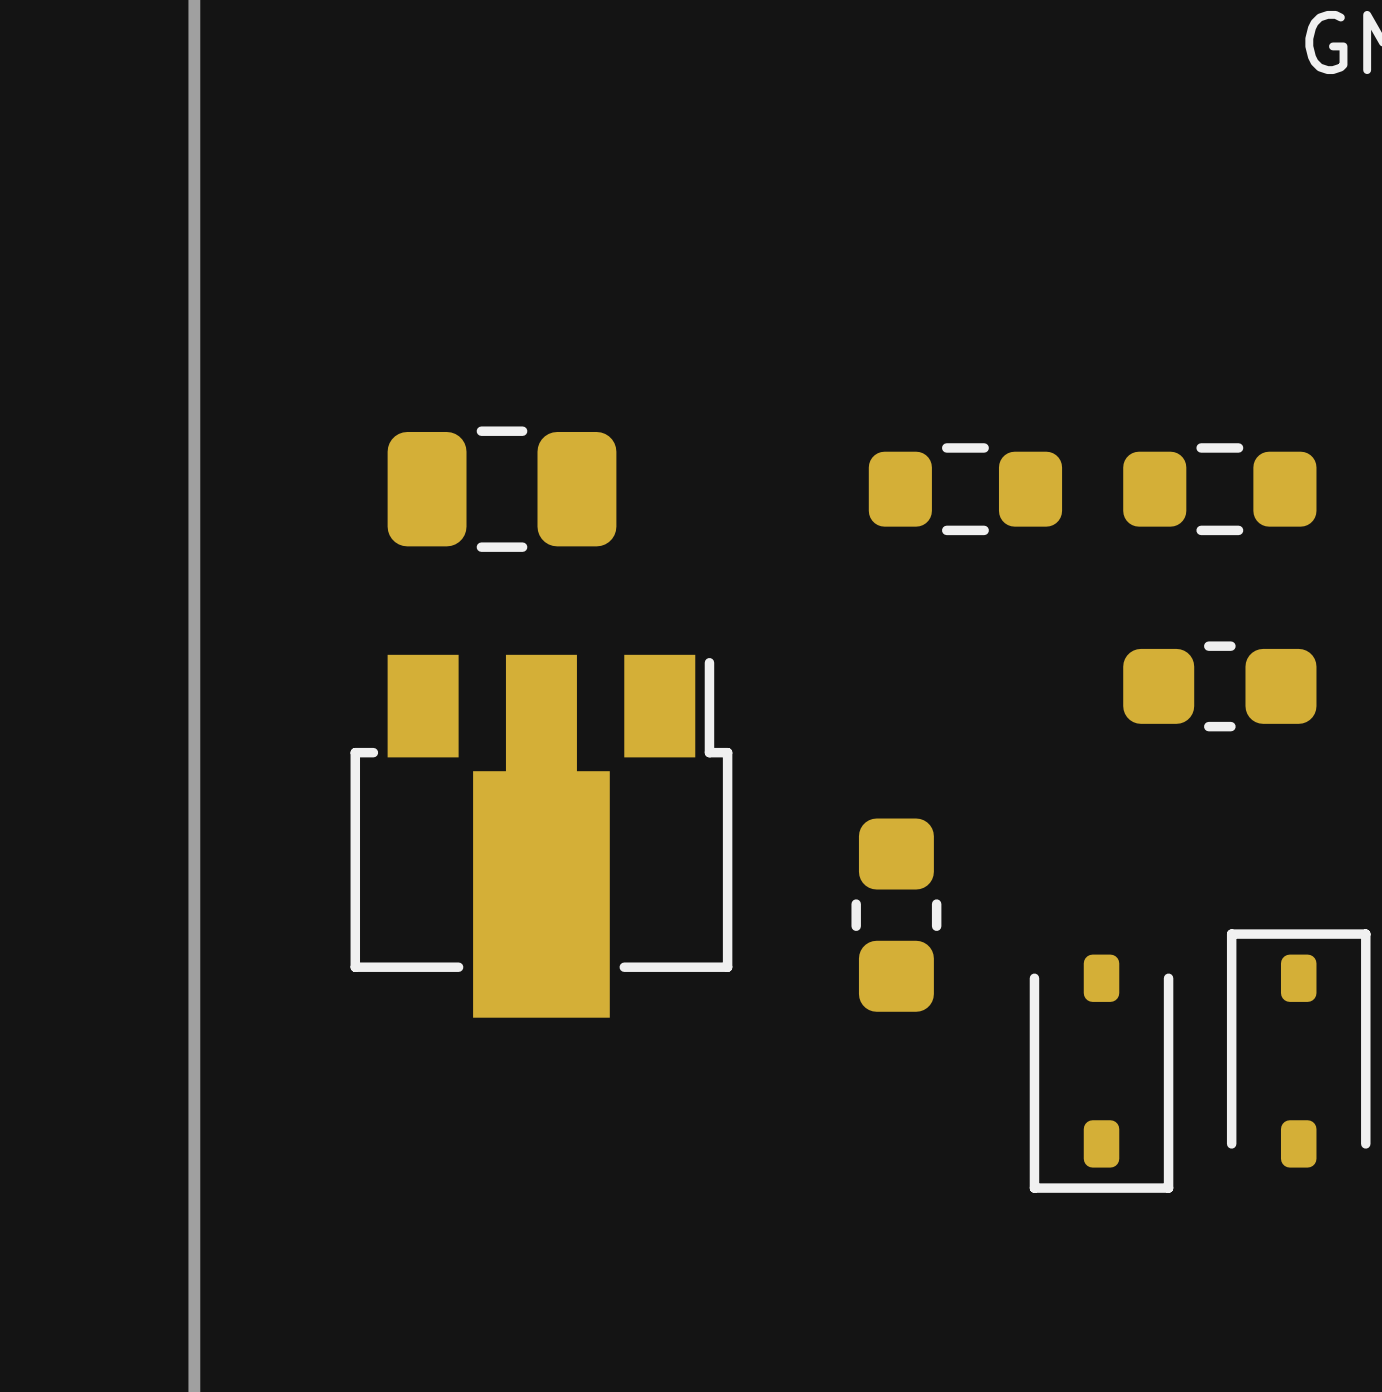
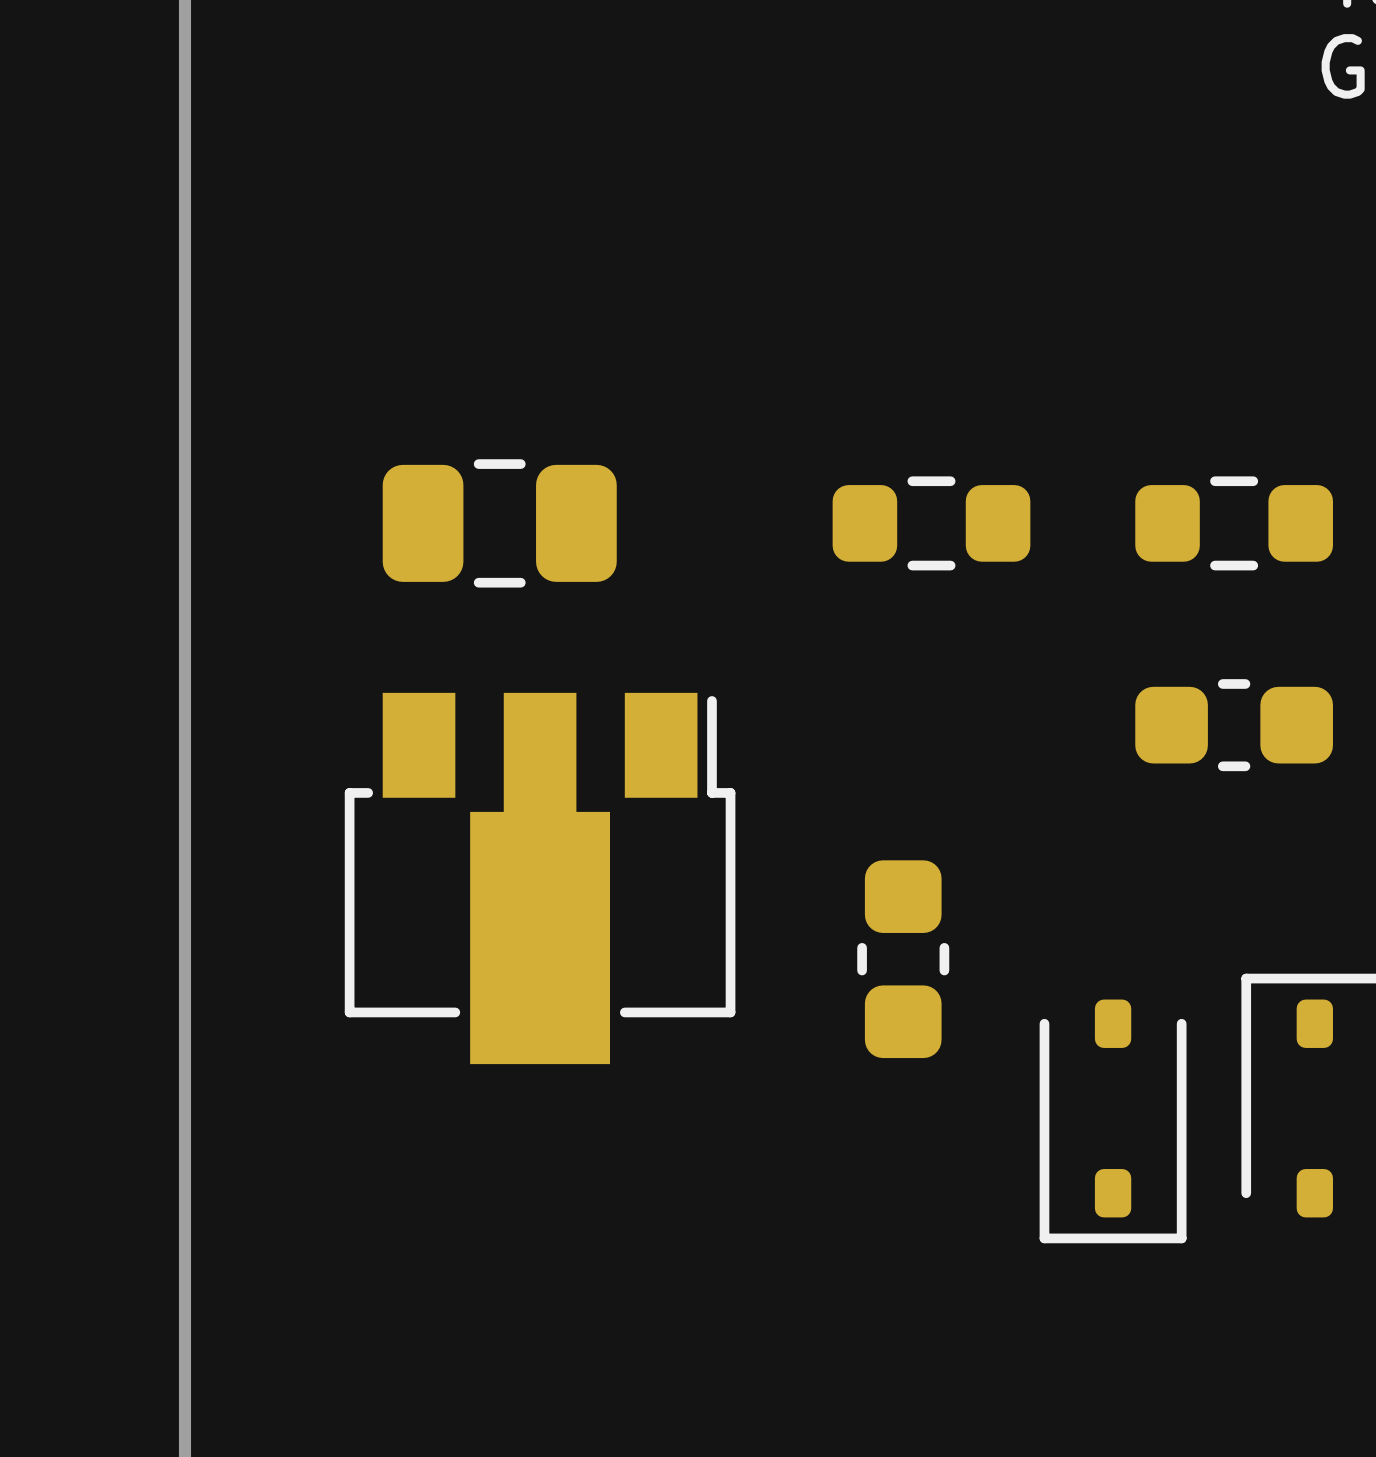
part position: (965, 489) -> (931, 523)

